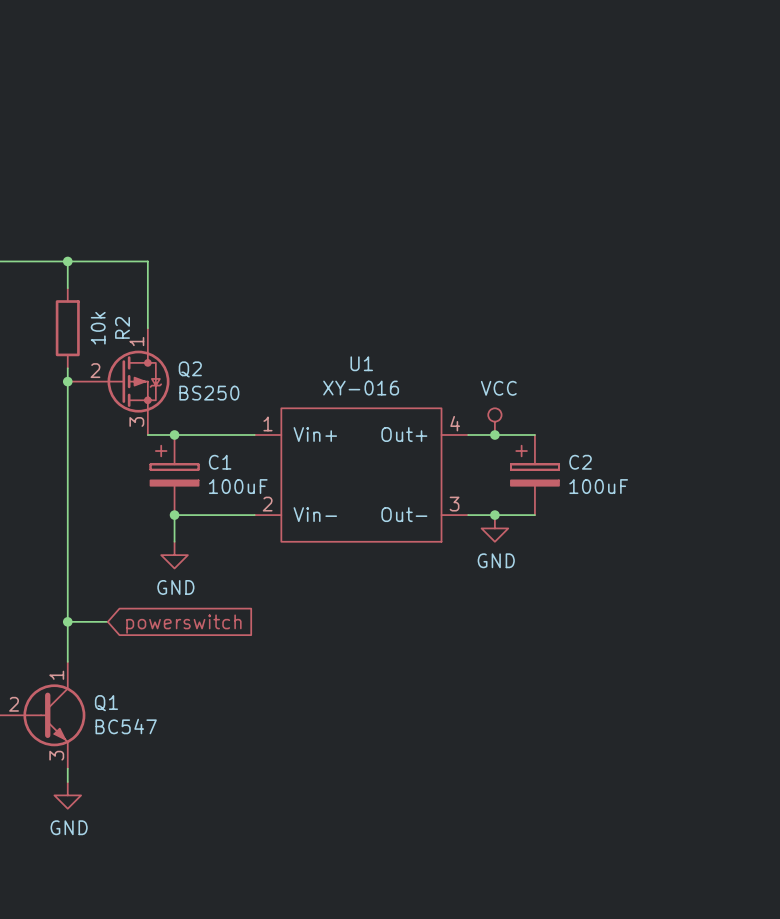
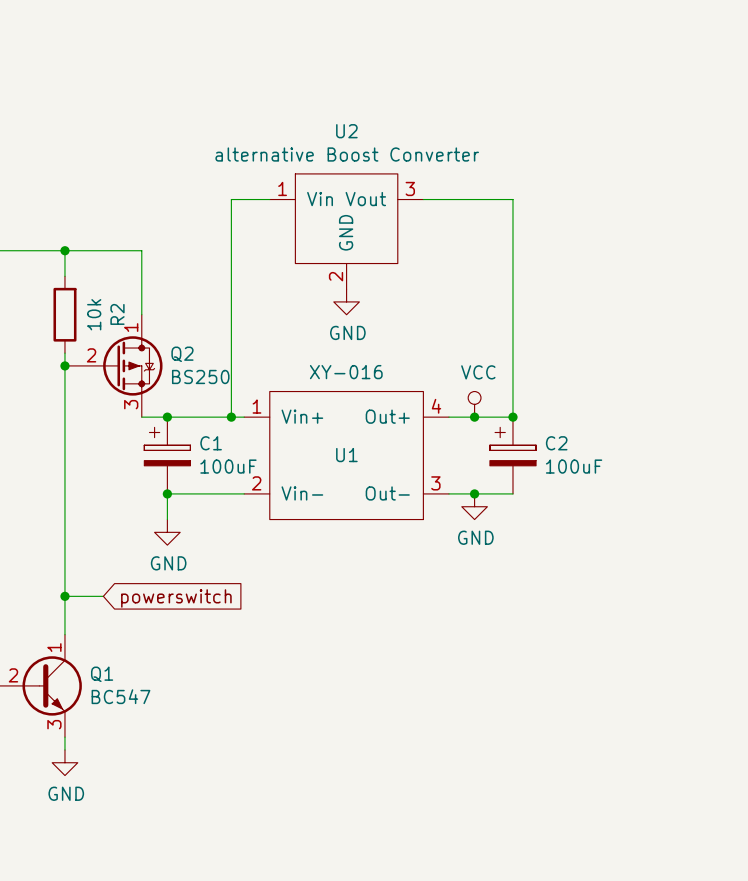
wire: none -> (269, 199) (231, 199) (231, 417)
wire: none -> (423, 199) (512, 199) (512, 417)
U2: none -> alternative Boost Converter (346, 231)
power symbol: none -> GND (346, 301)
U1 name position: U1 (361, 363) -> U1 (346, 455)
junction: none -> (231, 417)
junction: none -> (512, 417)

